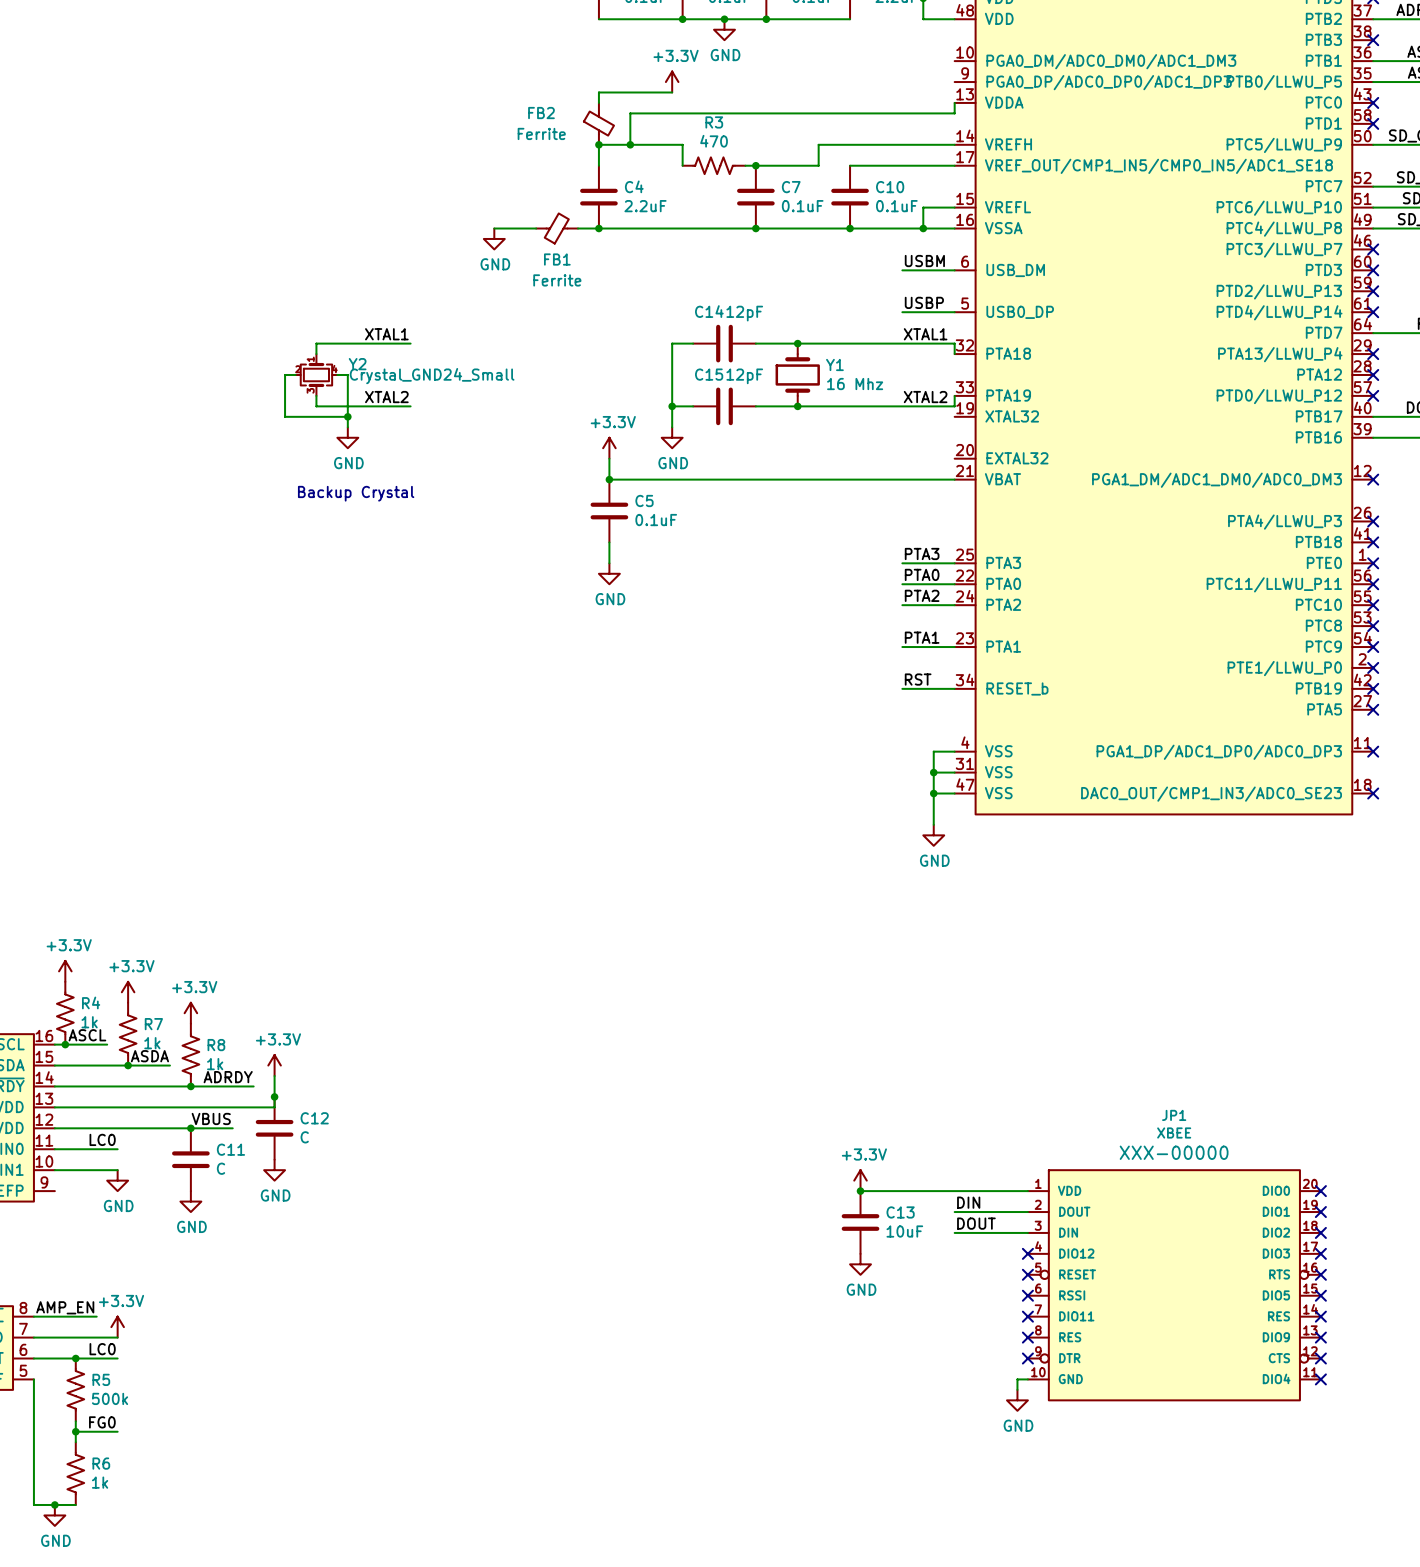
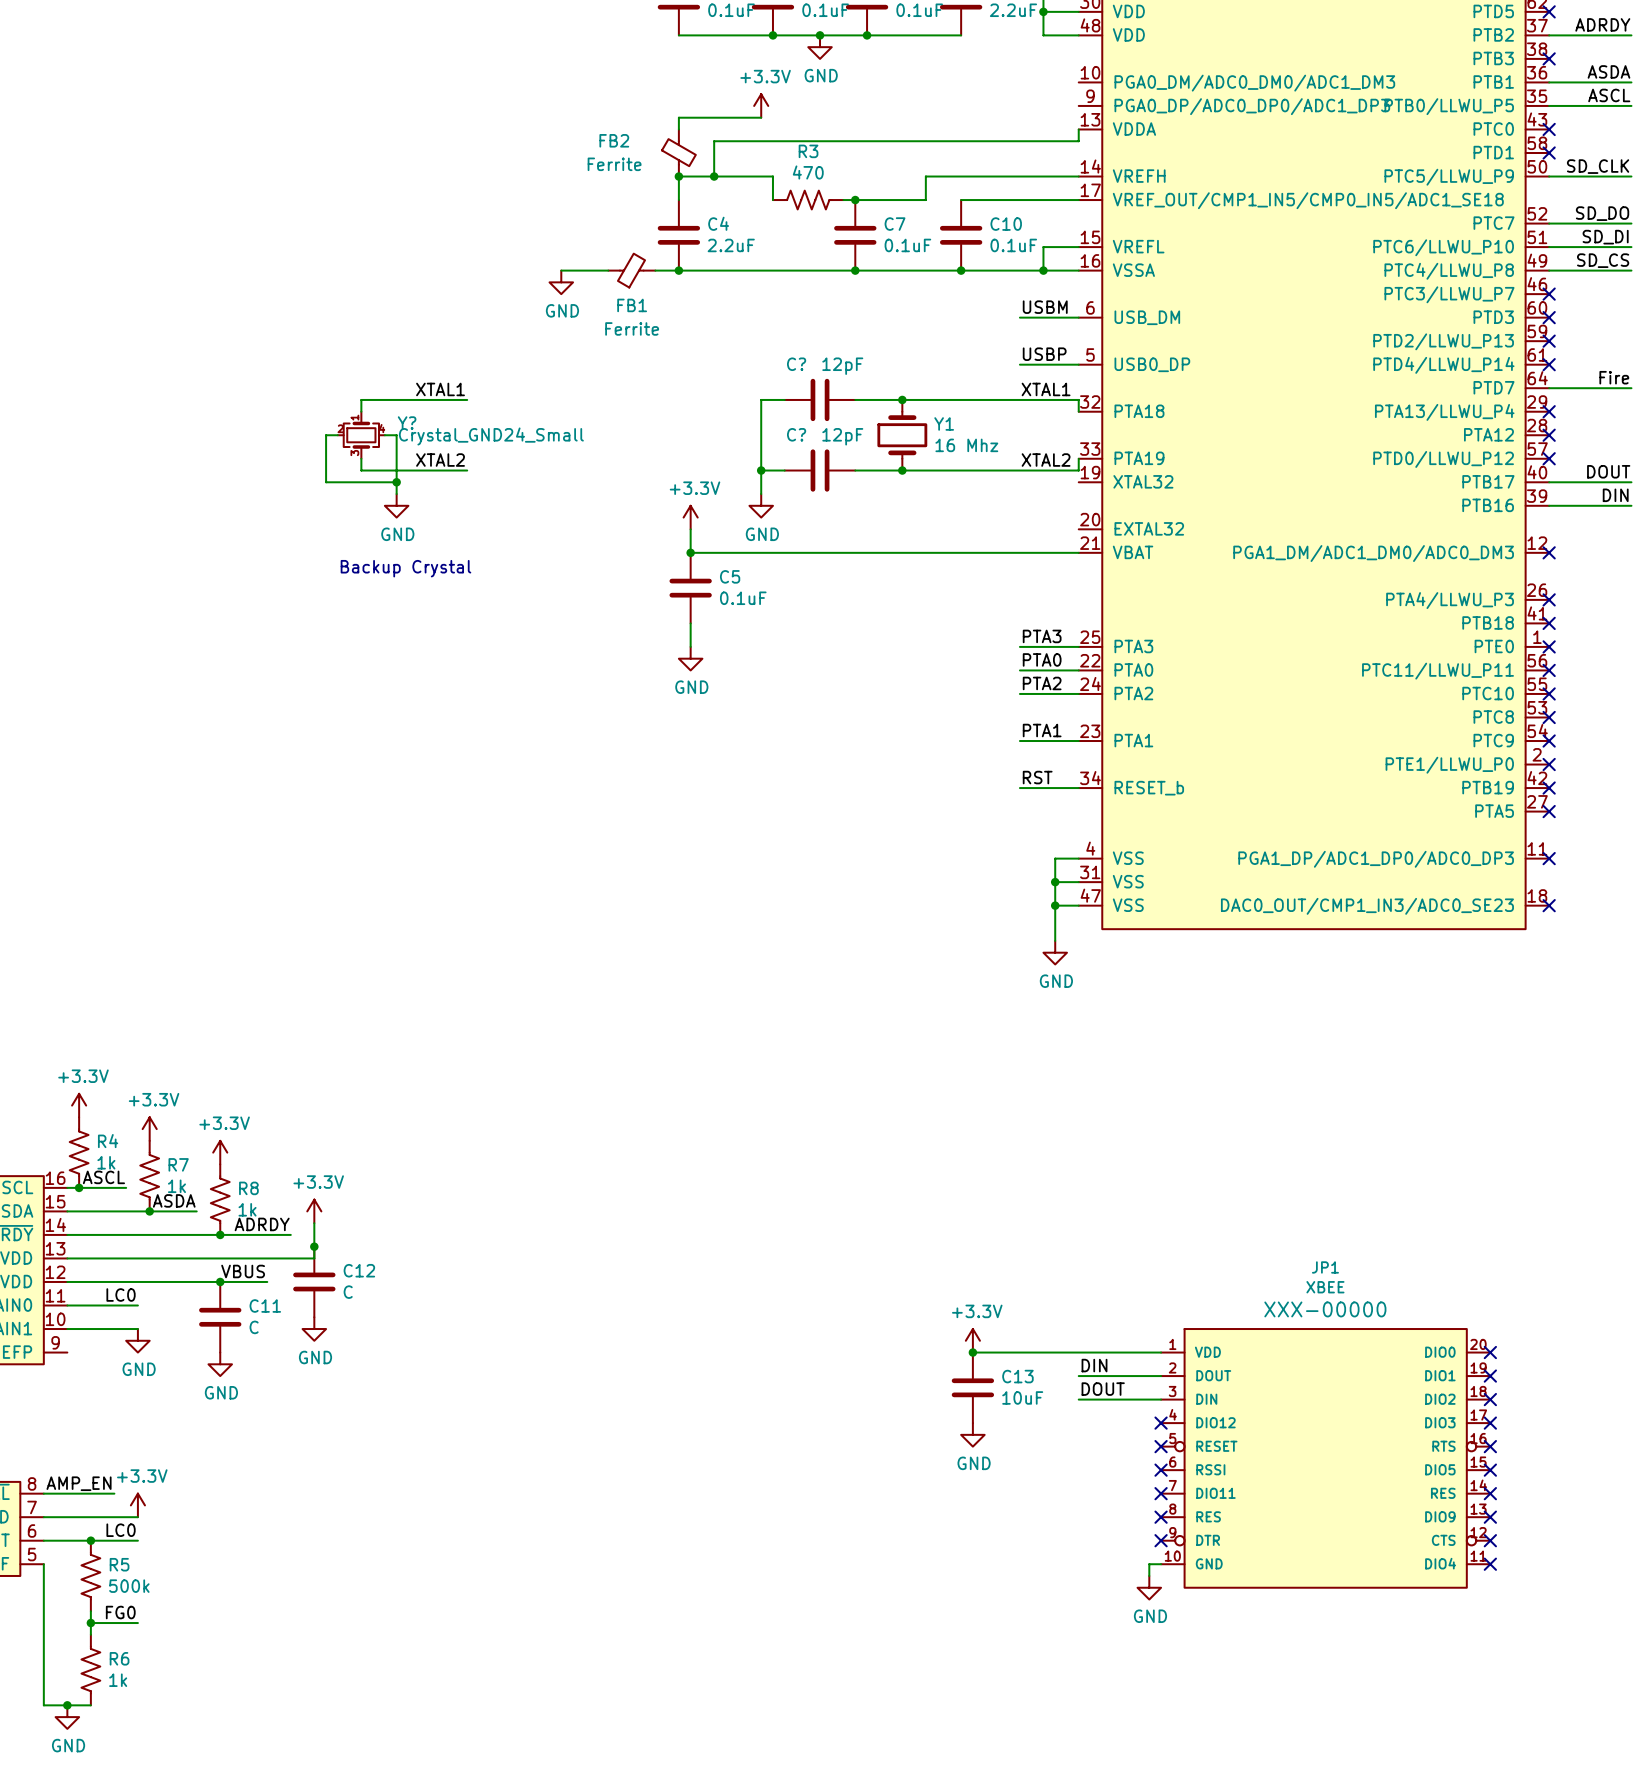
C14 name: C14 (709, 311) -> C? (796, 364)
Y2 name: Y2 (357, 364) -> Y? (407, 423)
C15 name: C15 (709, 374) -> C? (796, 434)

